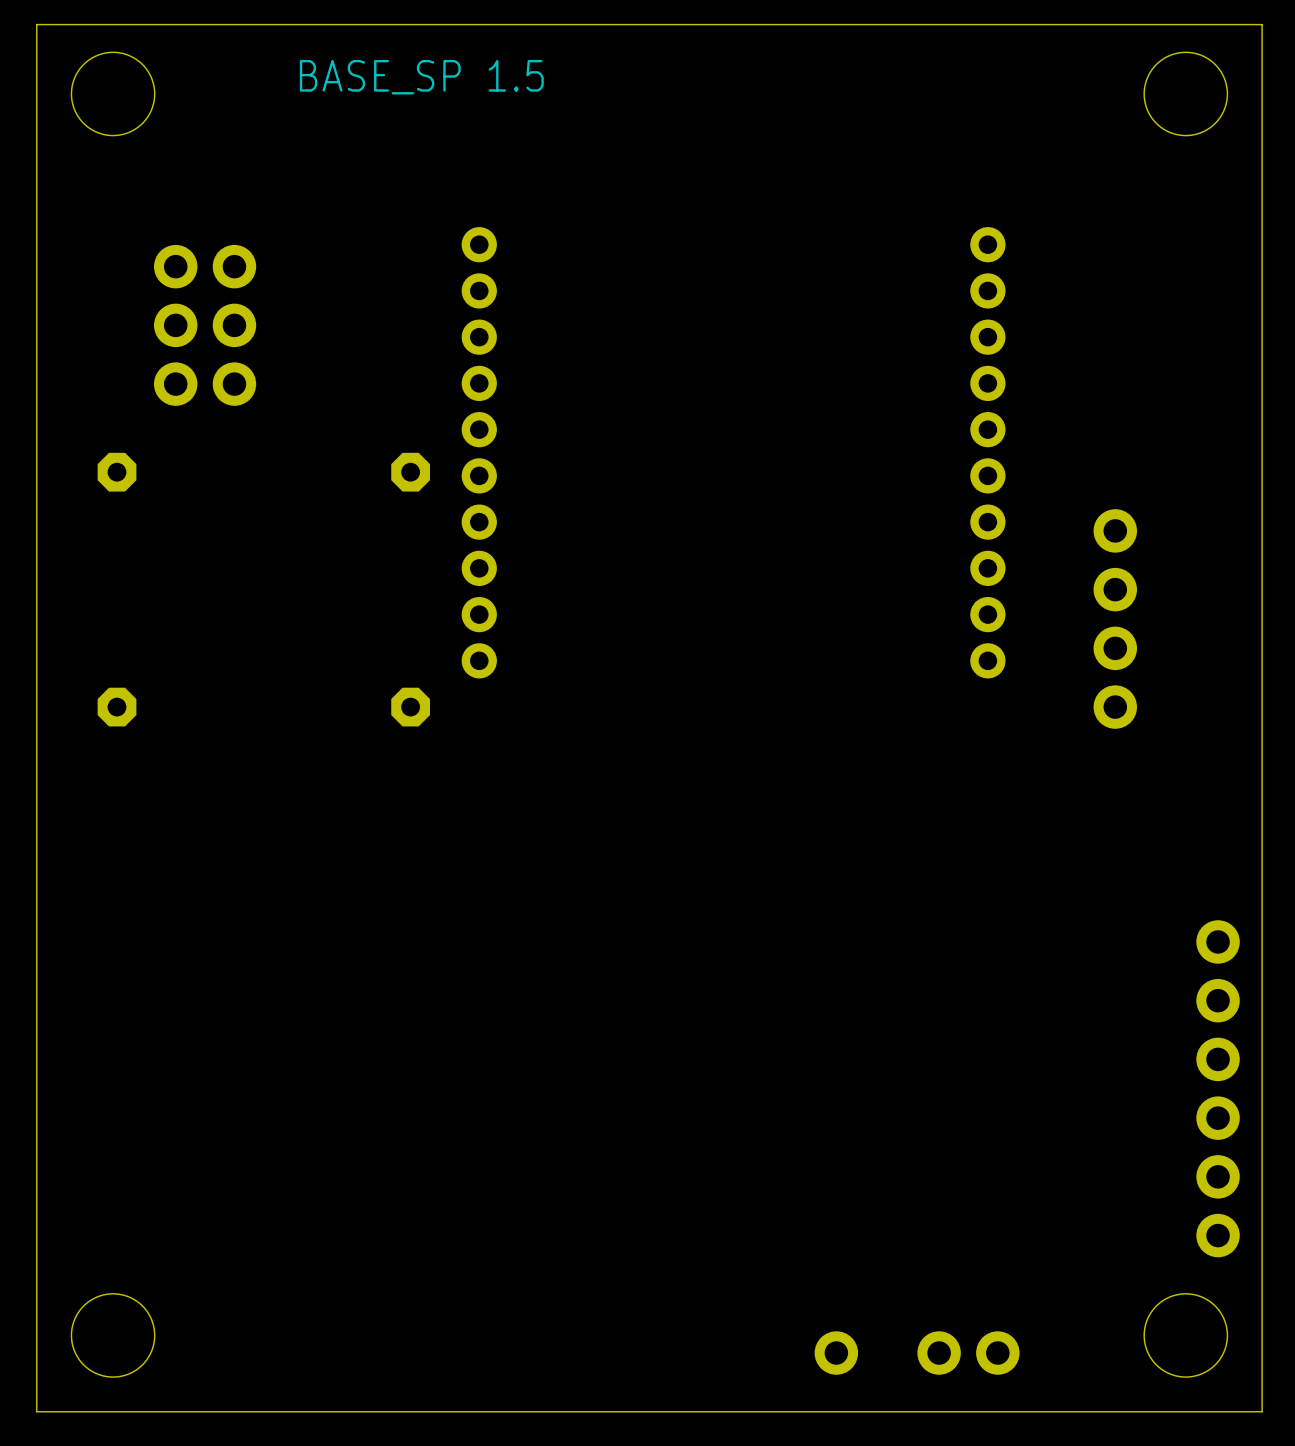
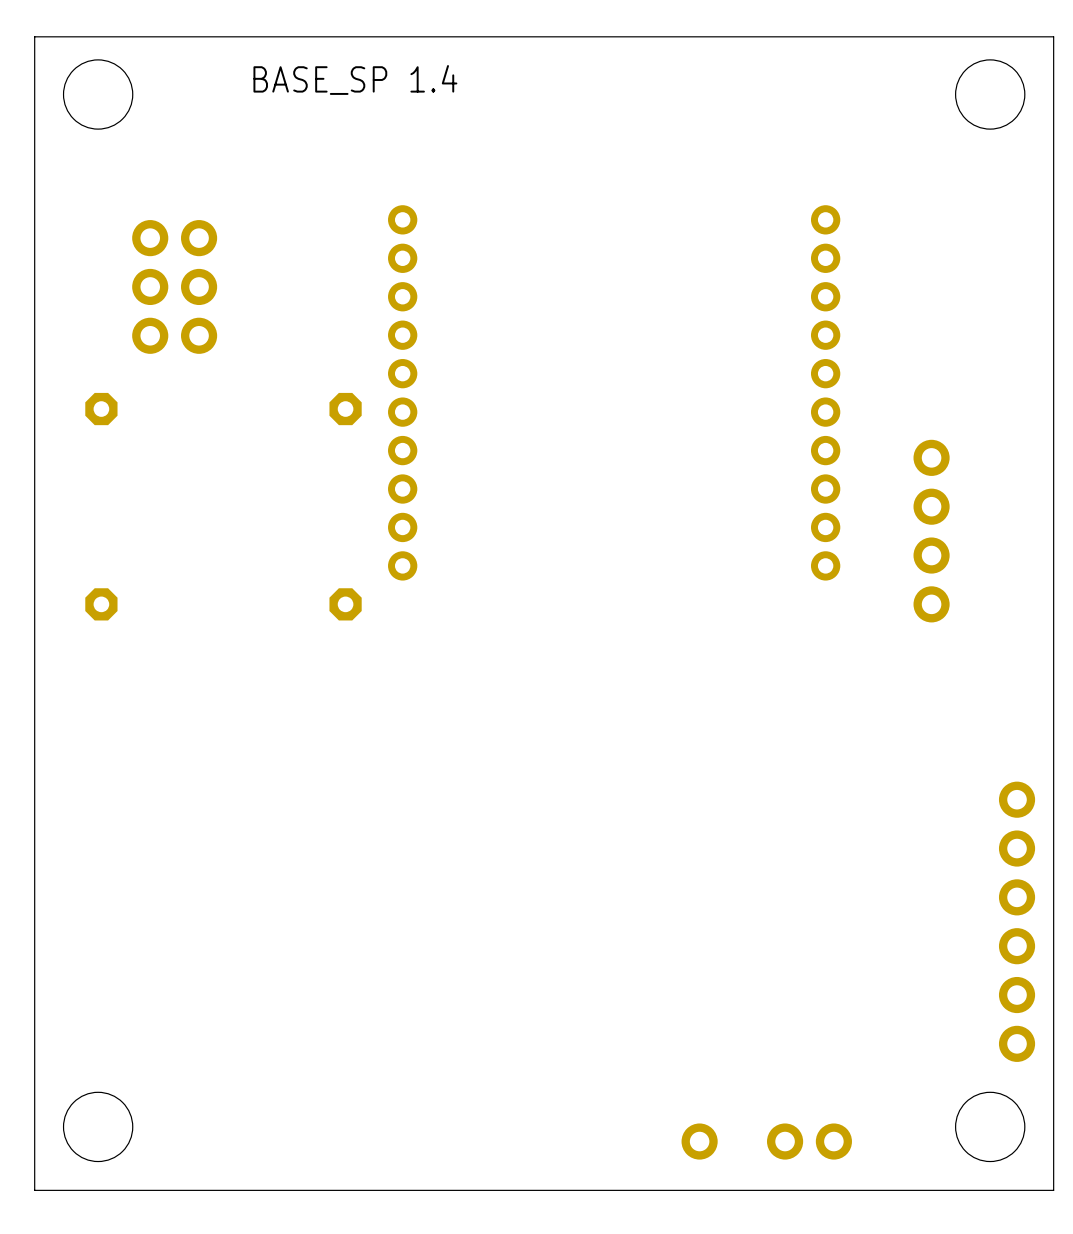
text: BASE_SP 1.5 (421, 77) -> BASE_SP 1.4 (355, 79)

